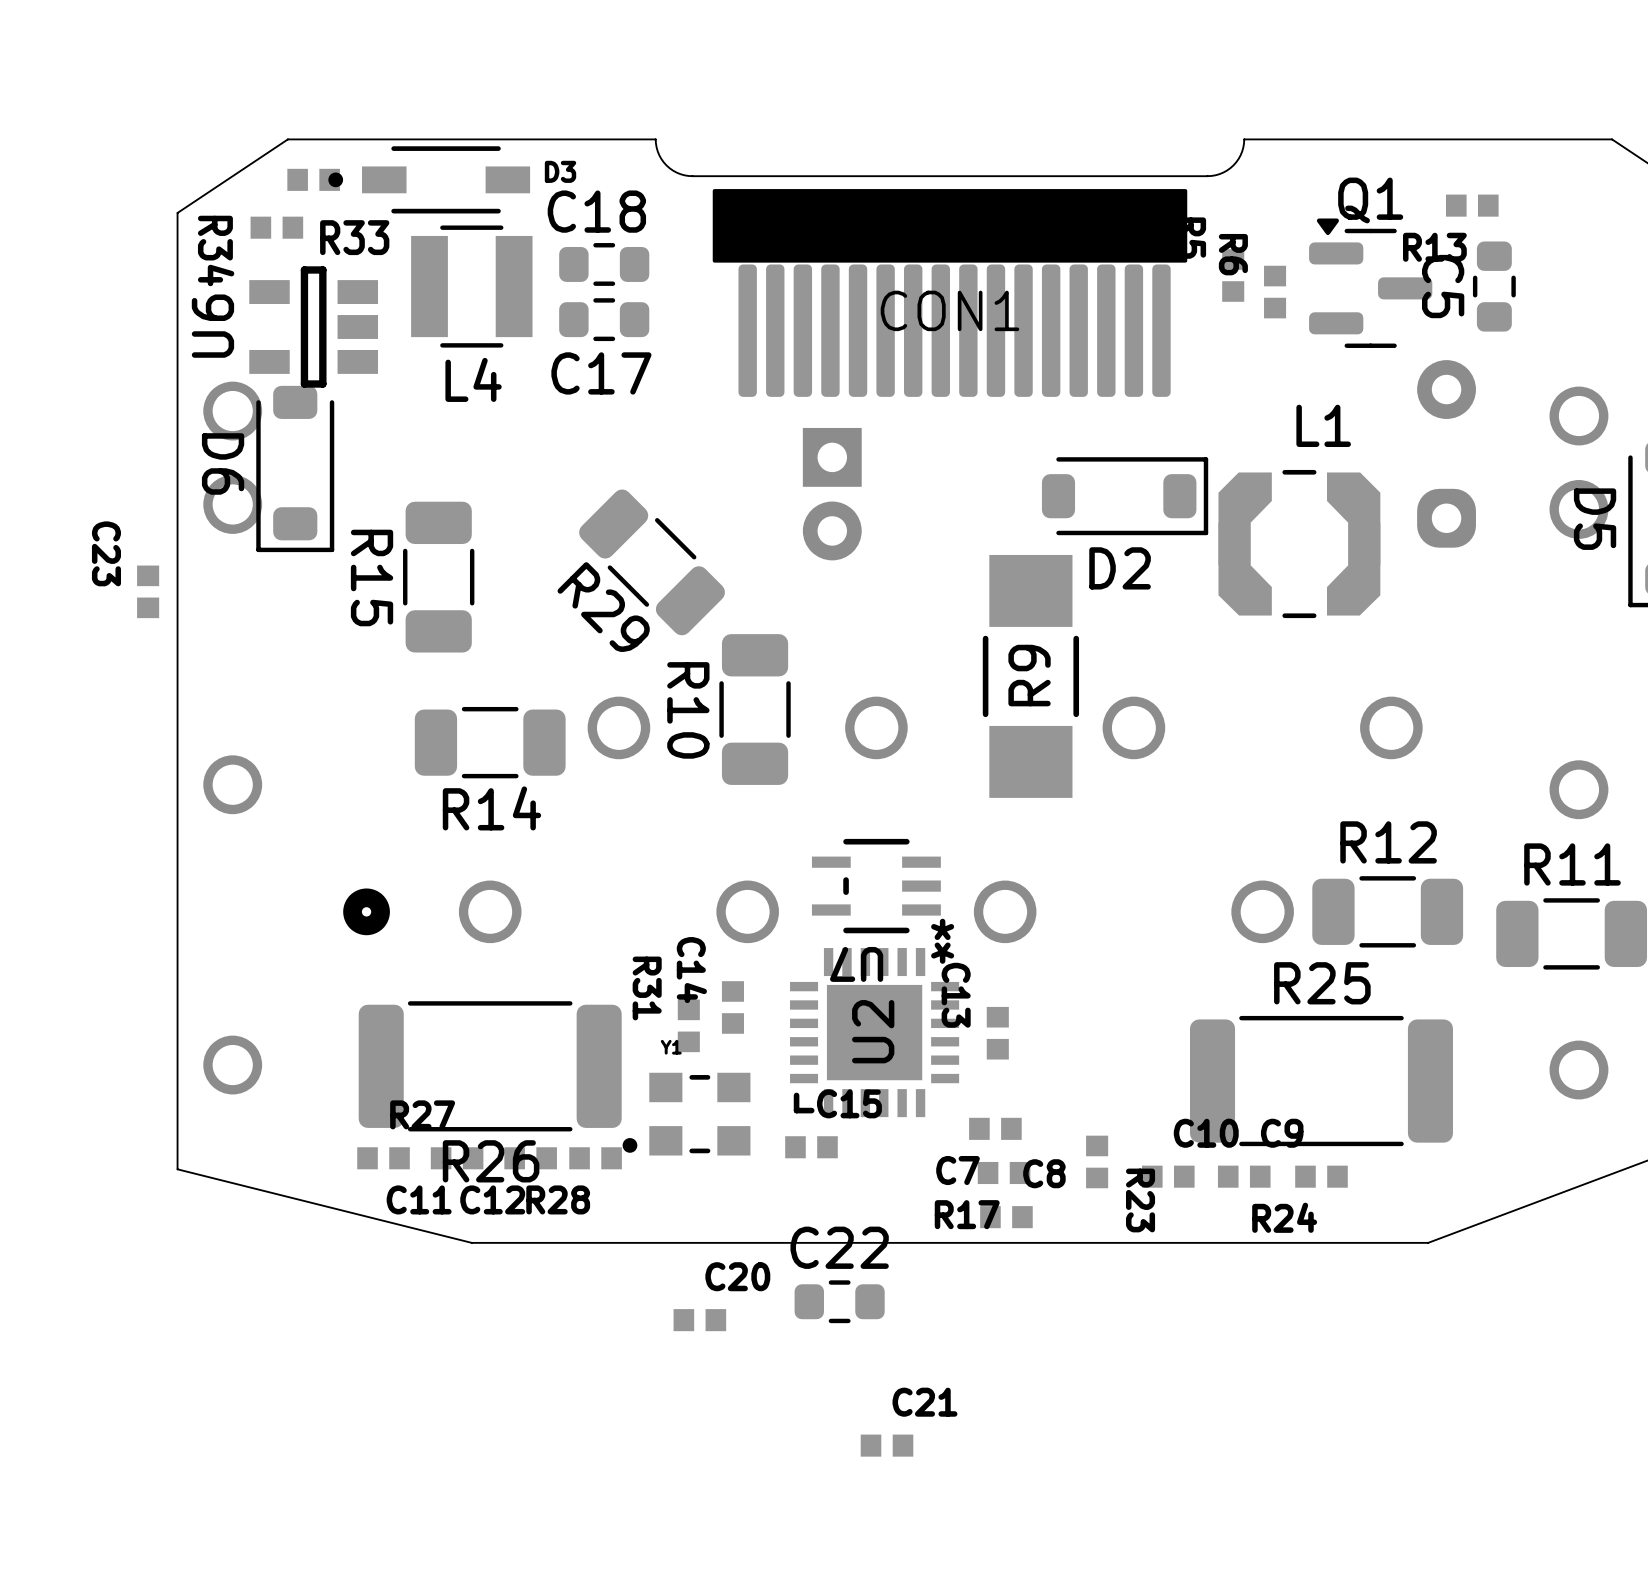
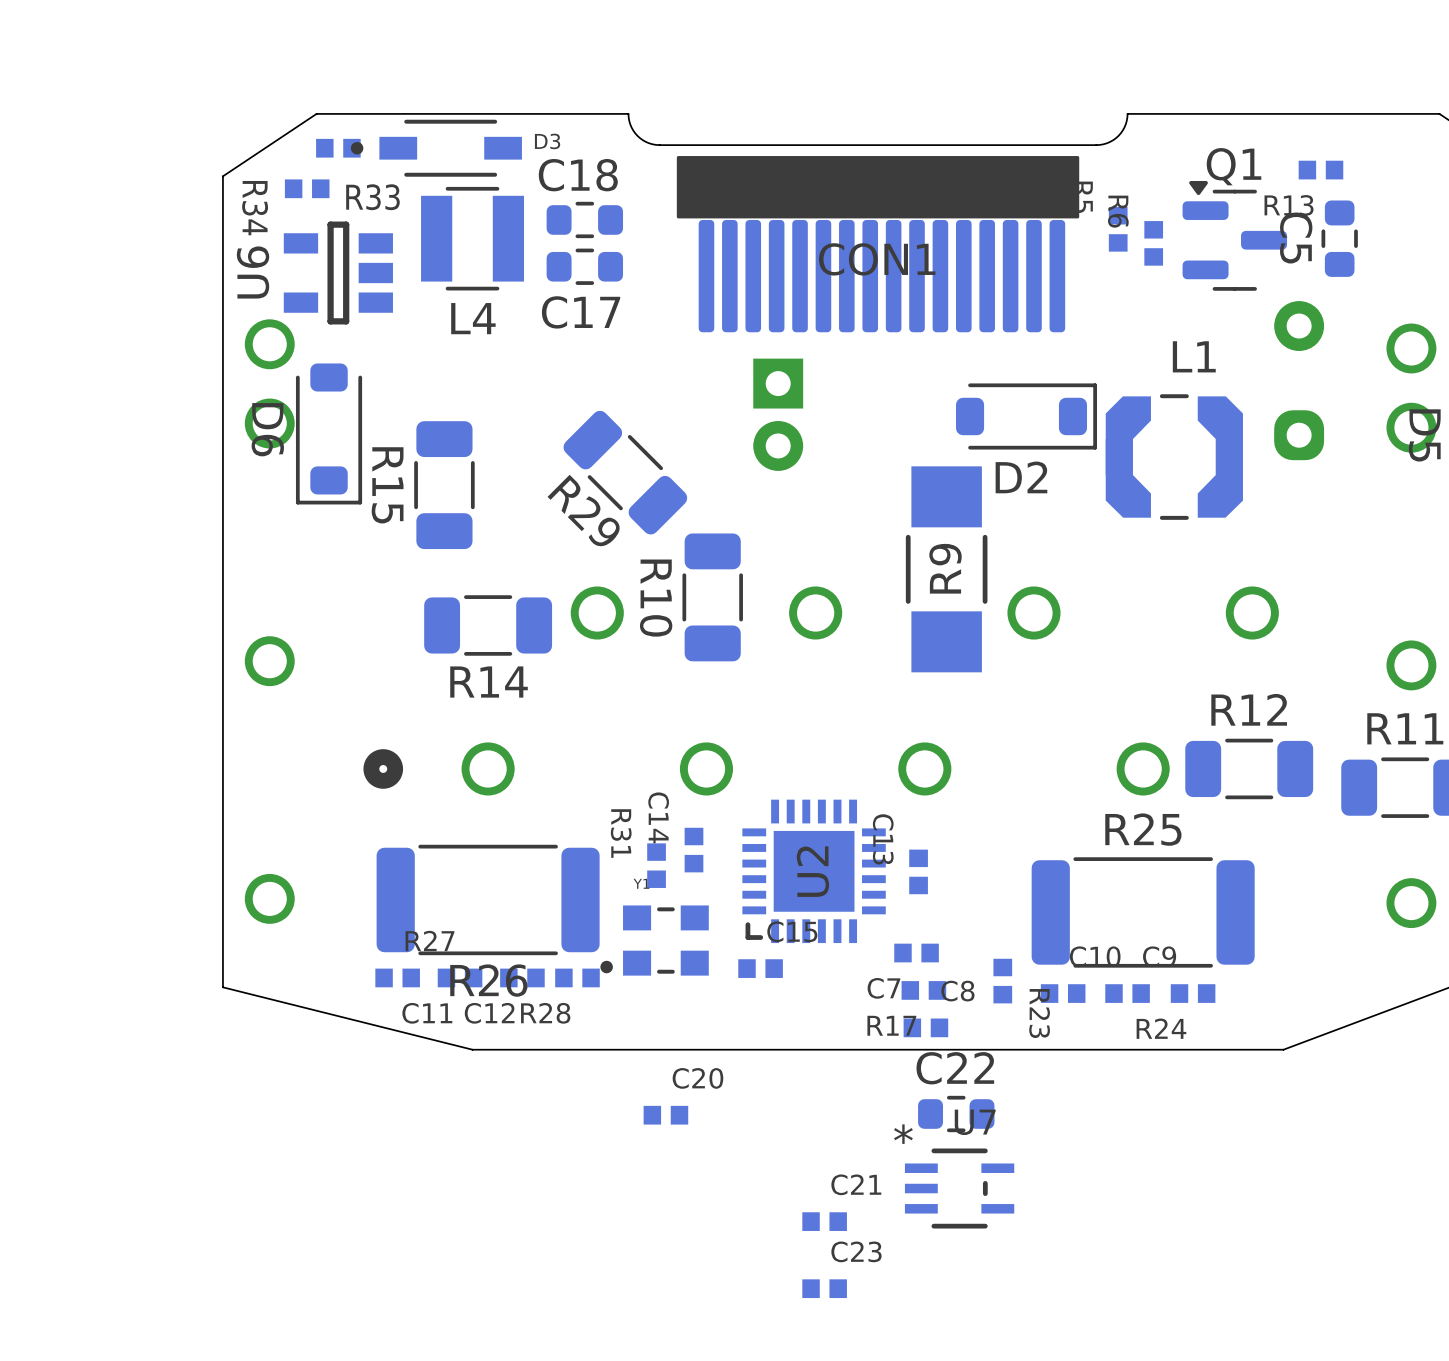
D6 position: (295, 468) -> (329, 433)
C23 rotation: 0° (148, 591) -> 90° clockwise (824, 1288)
C23 position: (148, 591) -> (824, 1288)
U7 rotation: 0° (876, 886) -> 180° (959, 1188)
U7 position: (876, 886) -> (959, 1188)
R25 position: (1321, 1081) -> (1143, 912)
C22 position: (839, 1301) -> (956, 1114)

